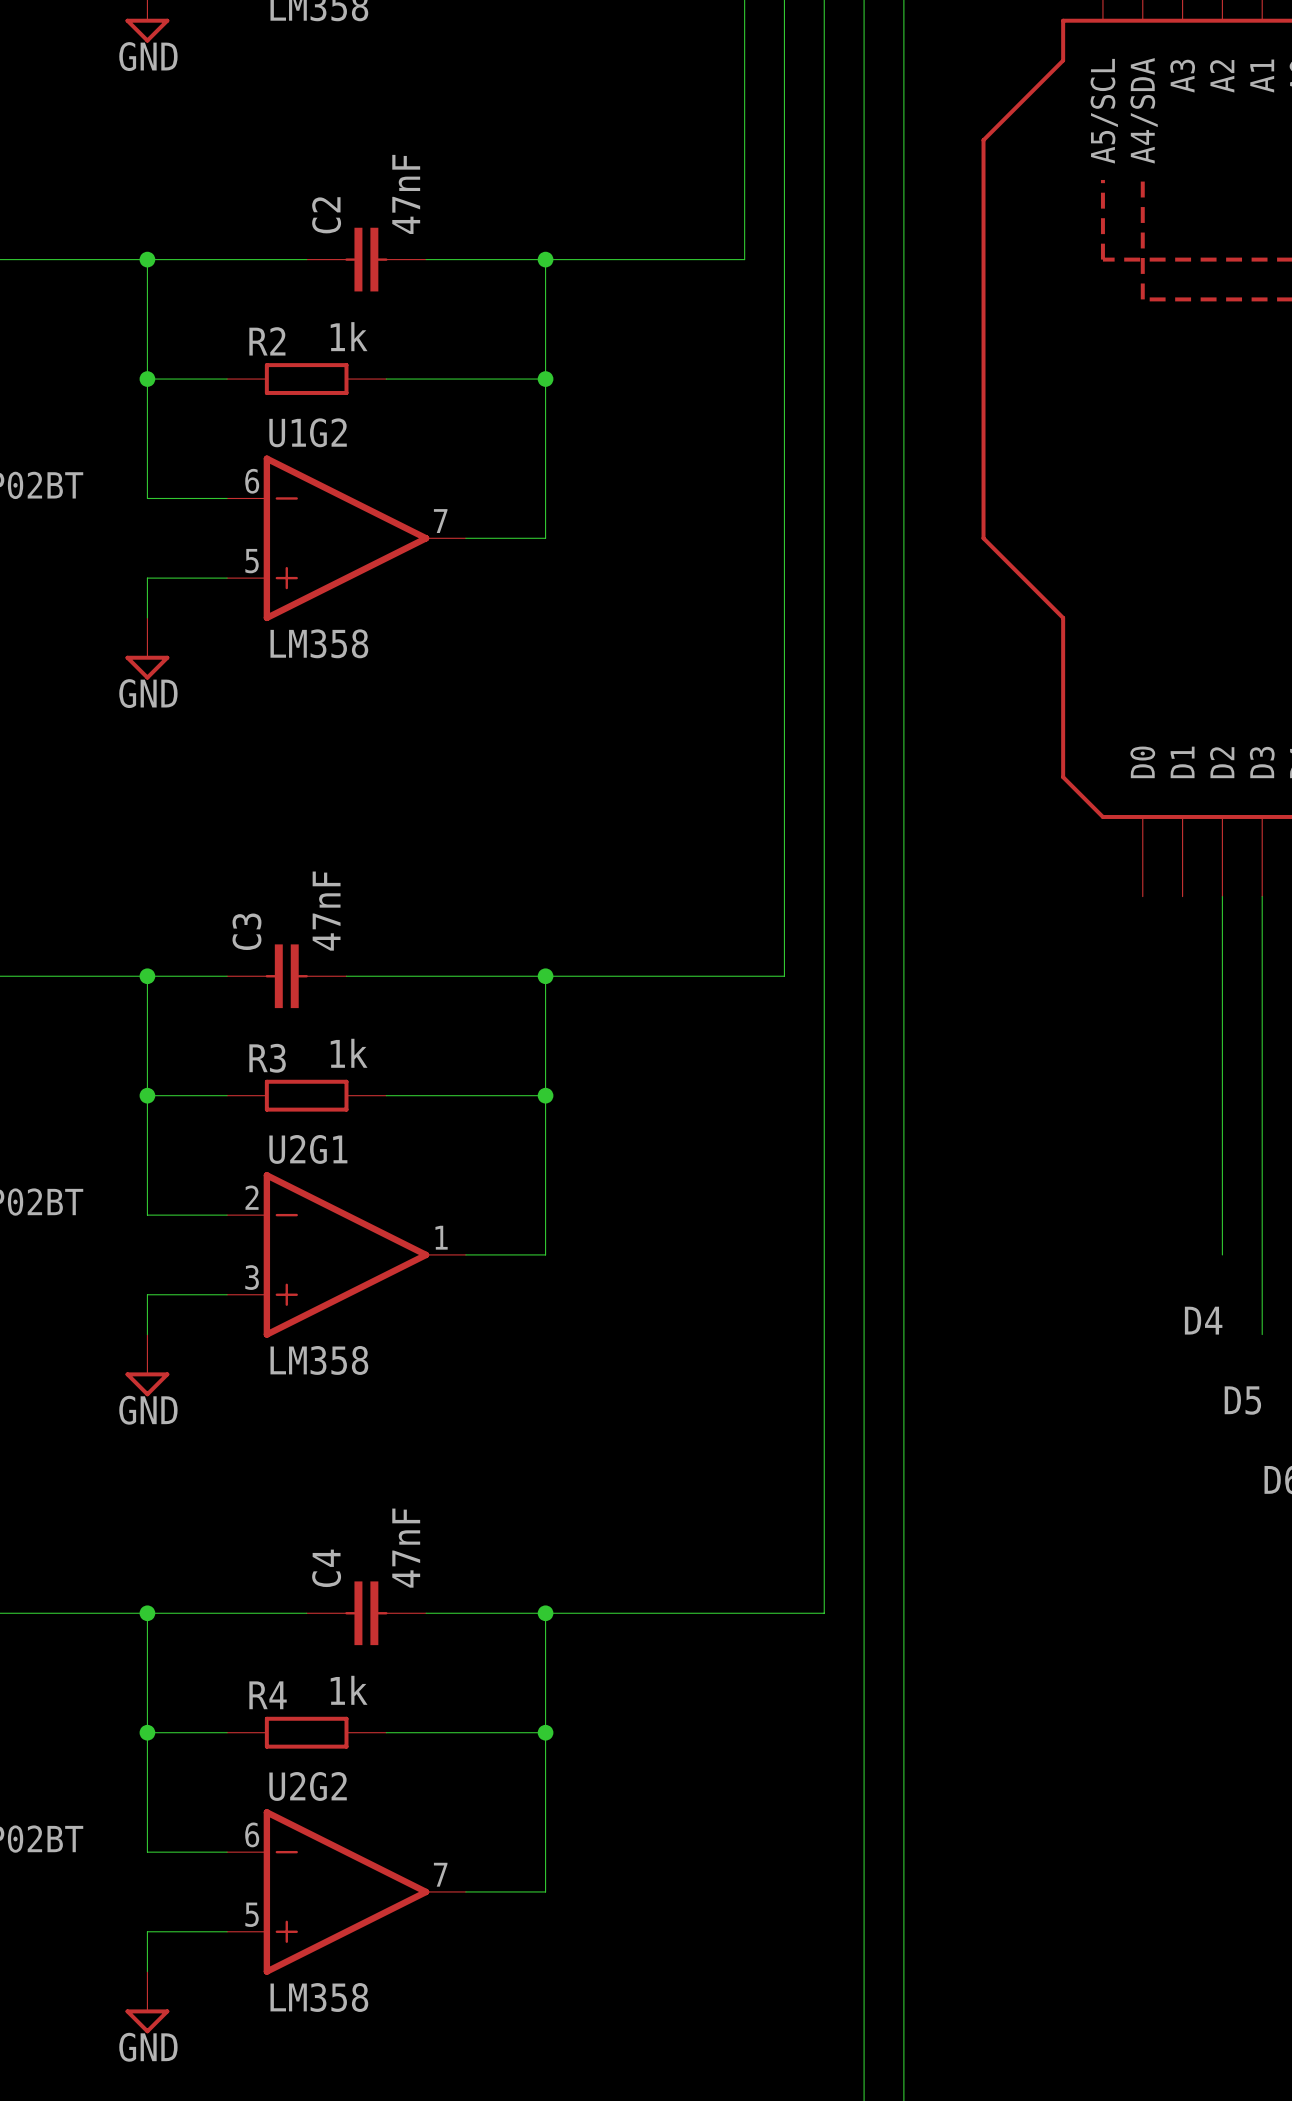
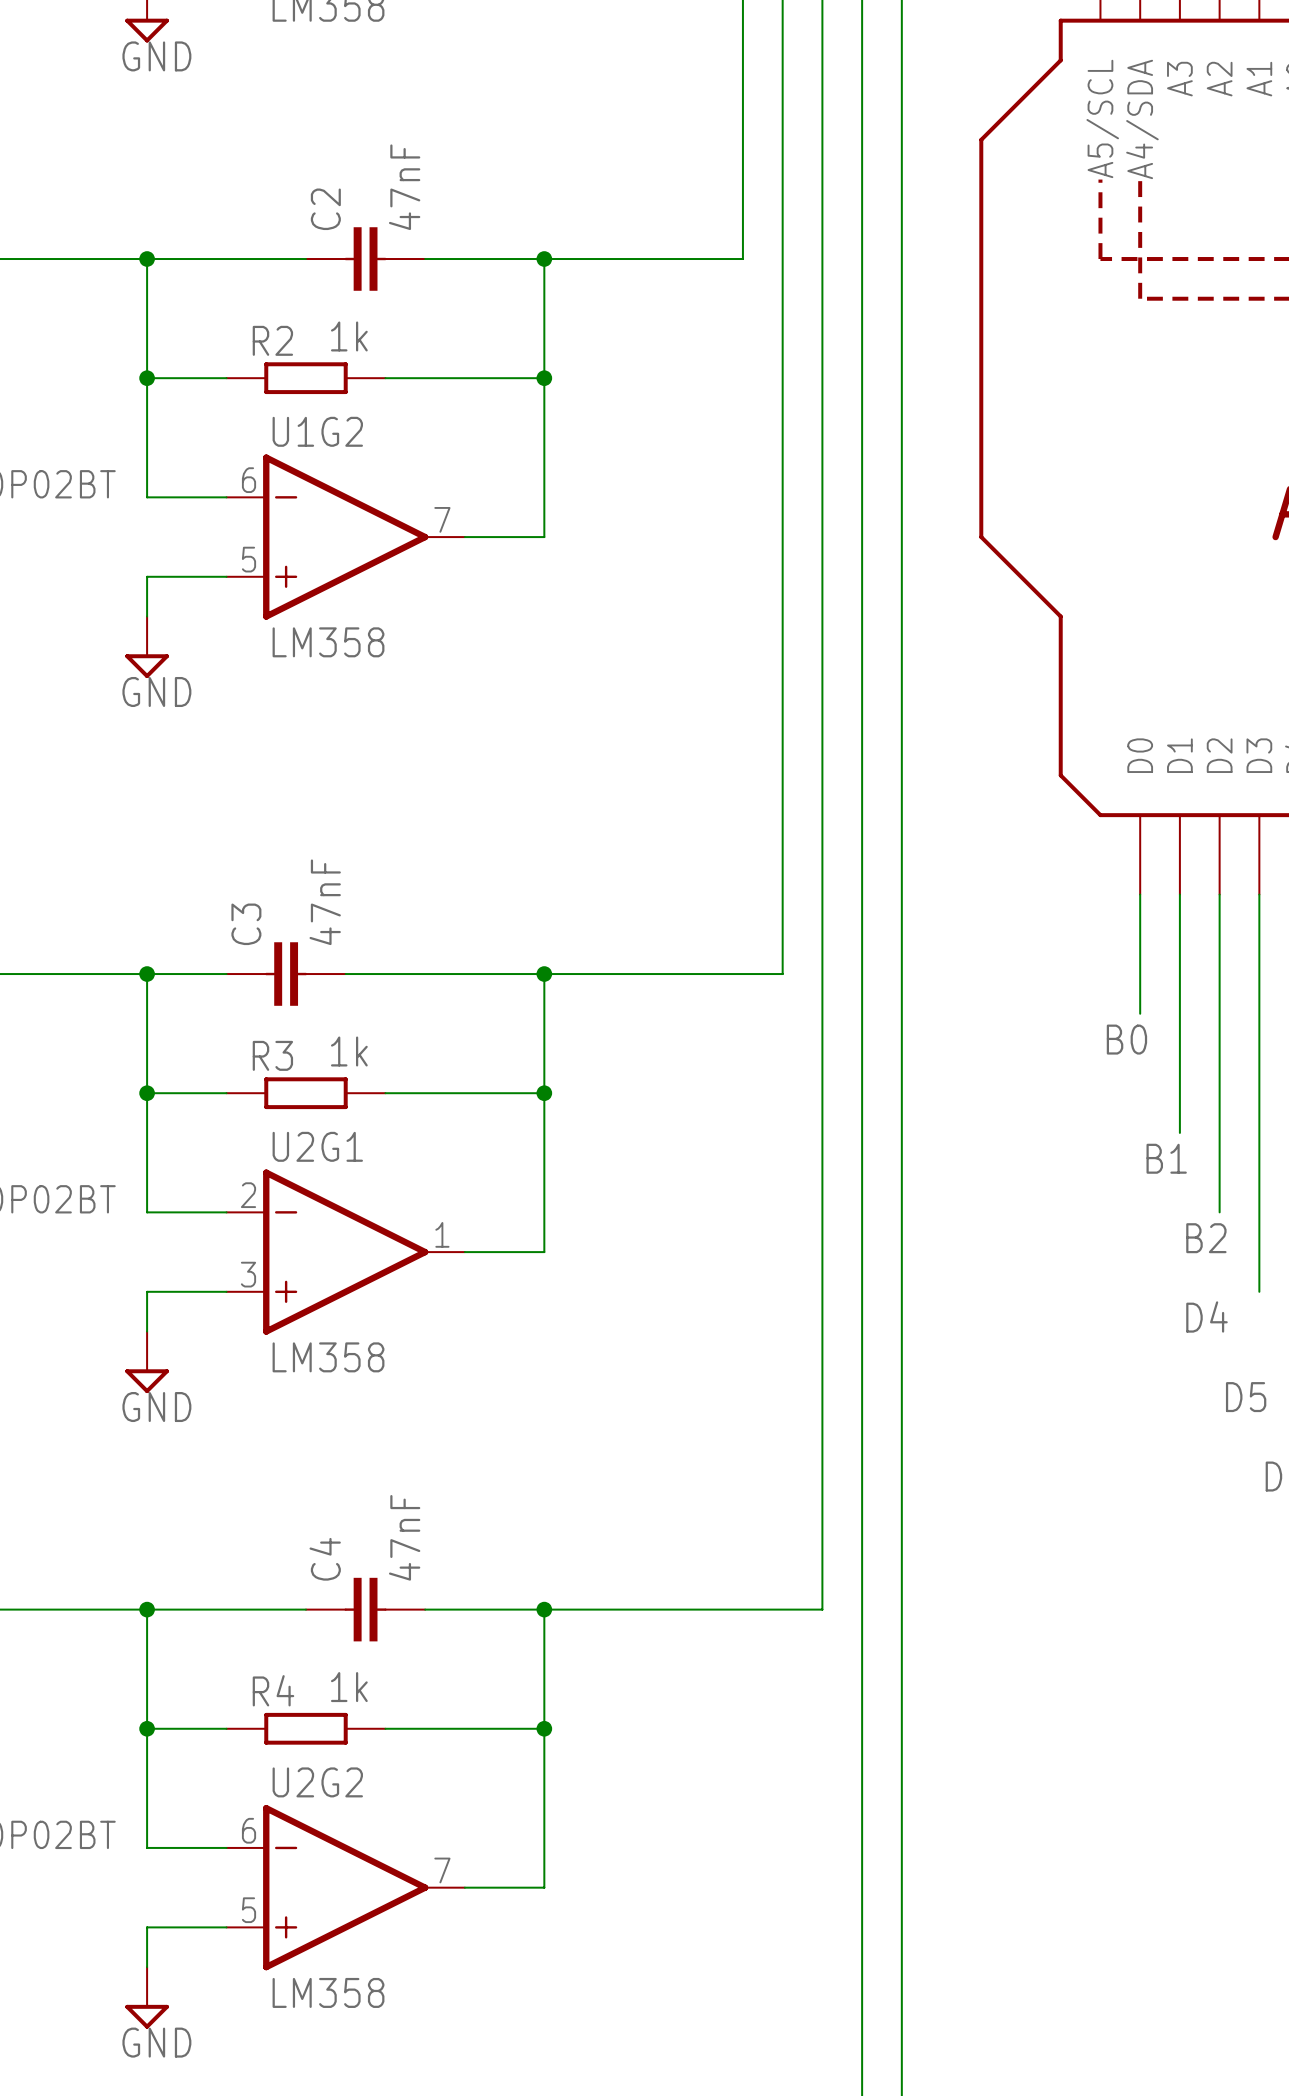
wire: none -> (1140, 894) (1140, 1013)
wire: none -> (1179, 894) (1179, 1132)
label: none -> B0 (1126, 1039)
label: none -> B1 (1166, 1158)
wire: (1222, 1215) (1222, 1254) -> none
label: none -> B2 (1206, 1238)
wire: (1262, 1294) (1262, 1334) -> none

